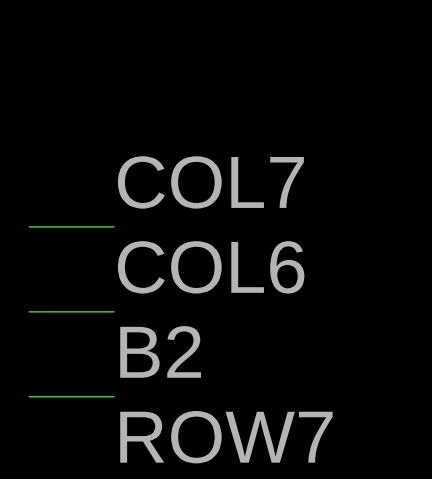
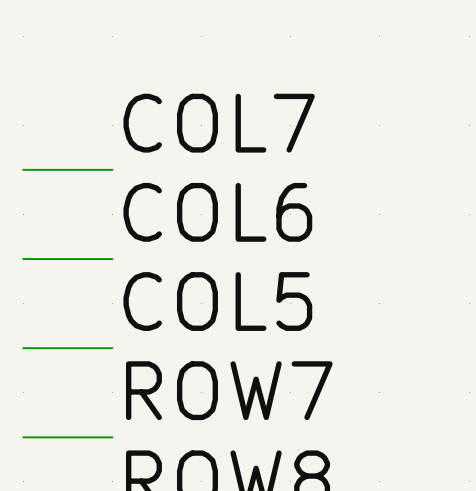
label: B2 (160, 351) -> COL5 (217, 301)

